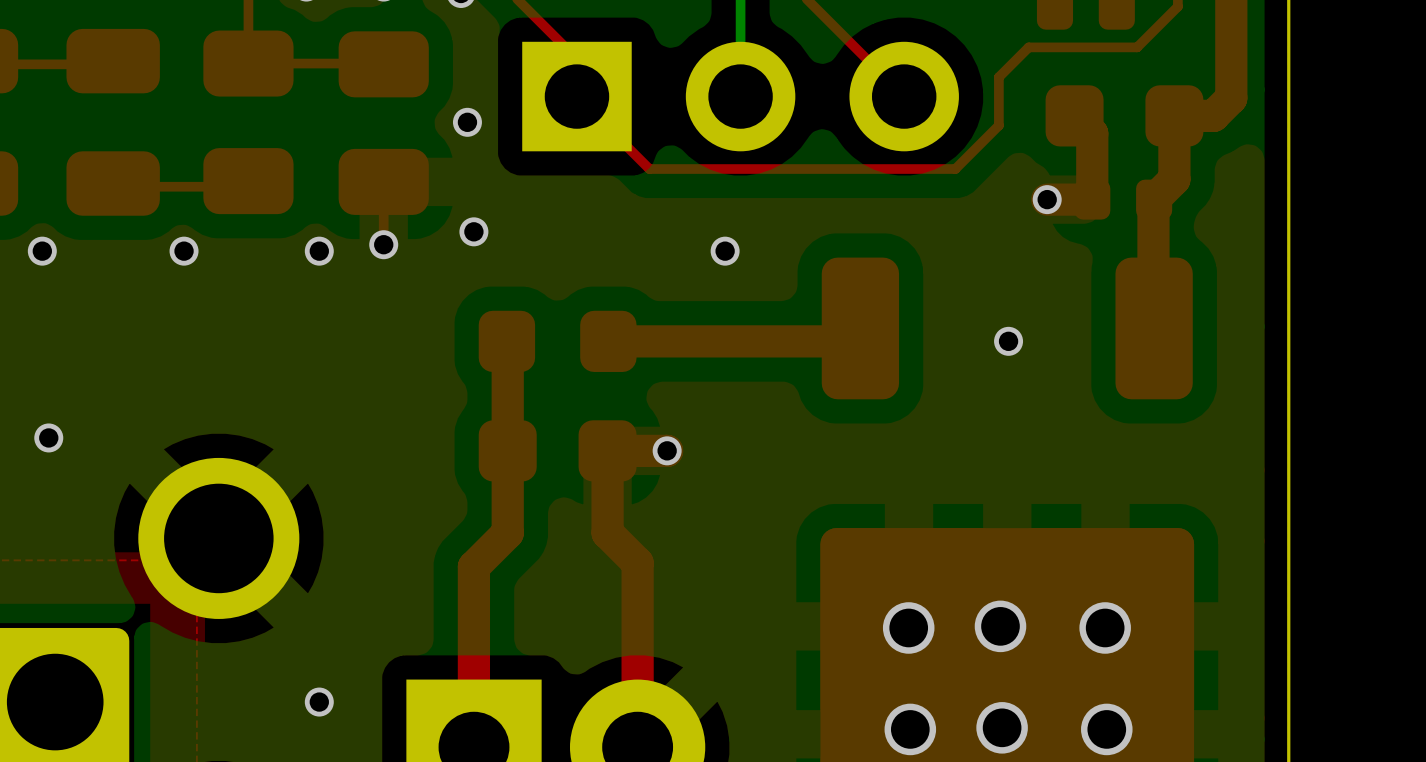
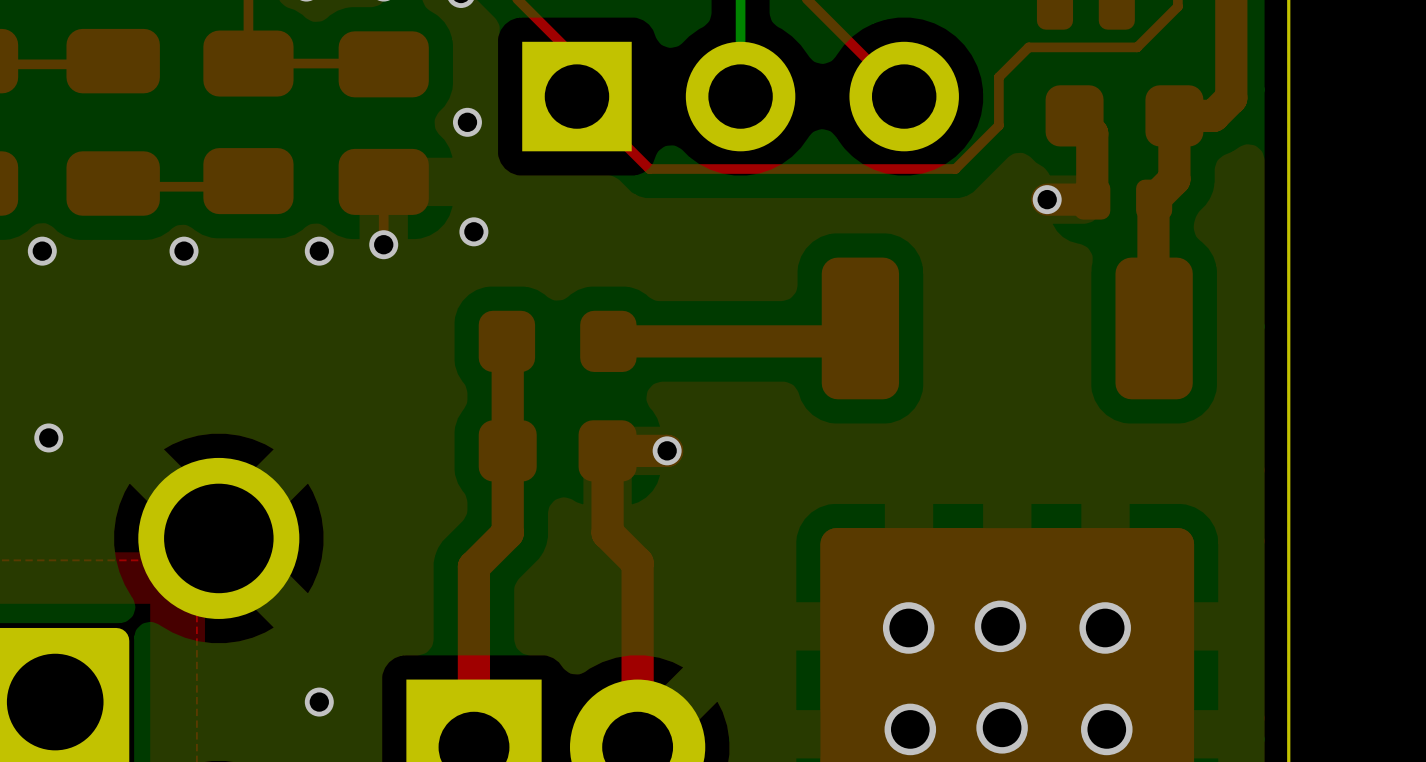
via: (725, 251) -> none
via: (1008, 341) -> none

